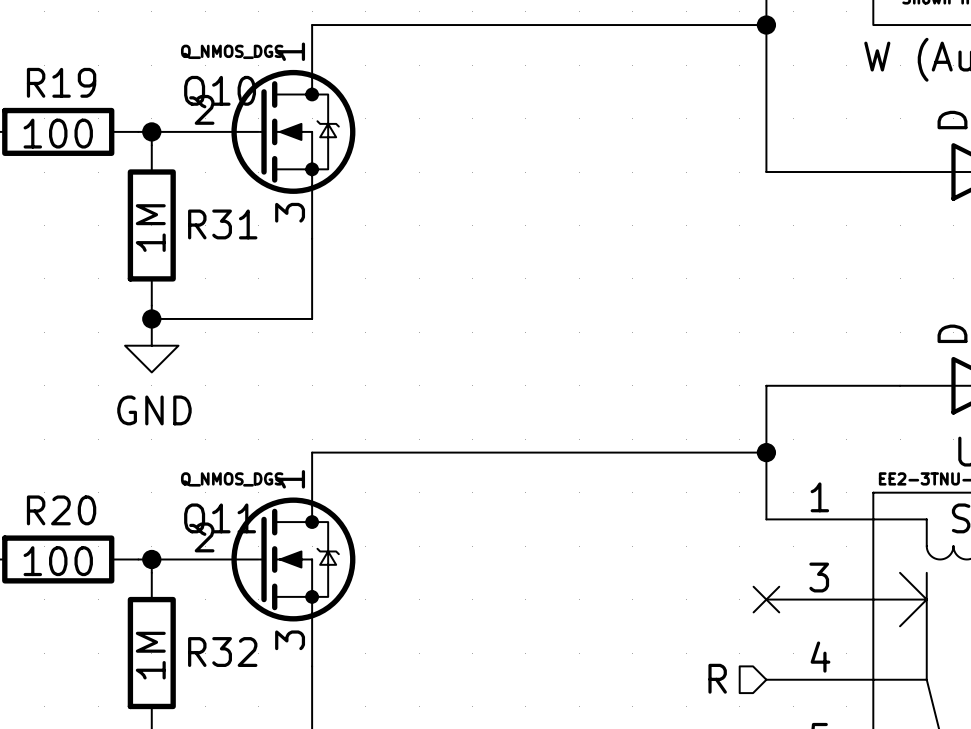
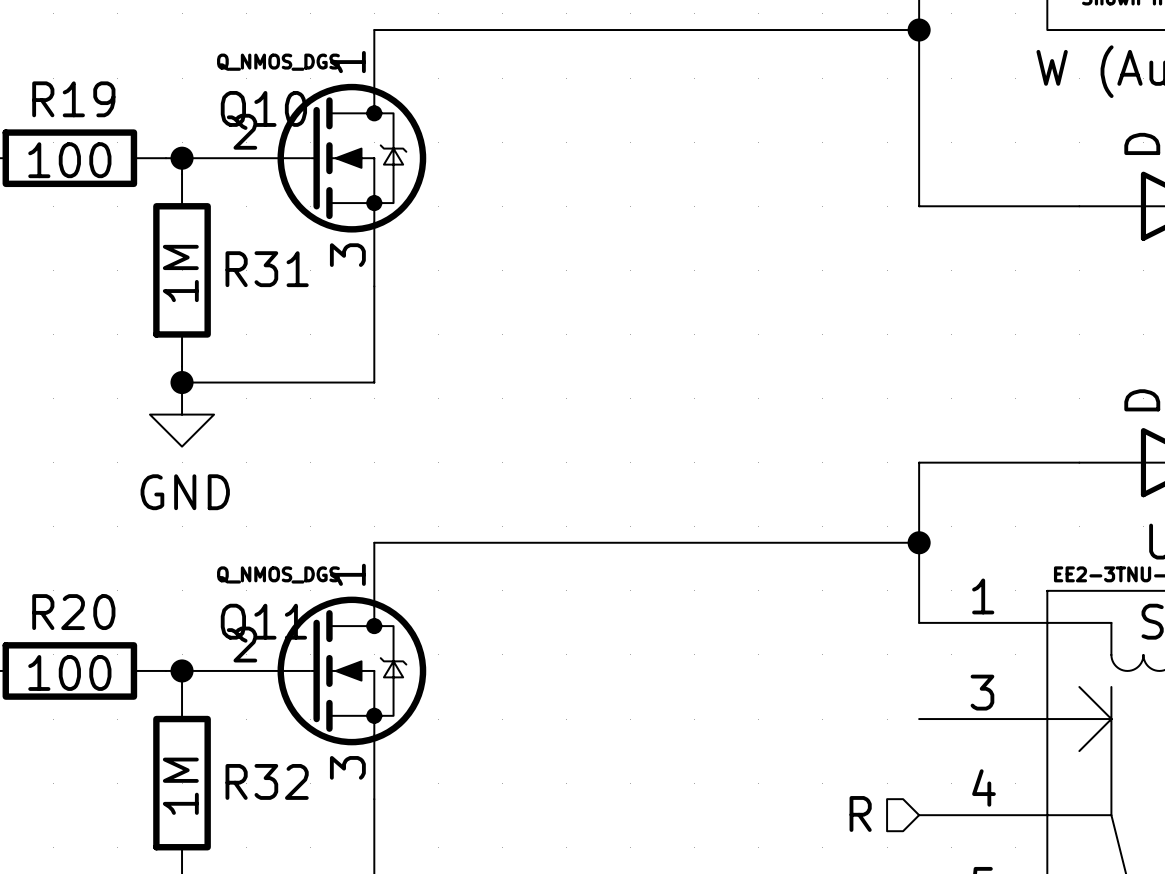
no-connect mark: (766, 599) -> none

